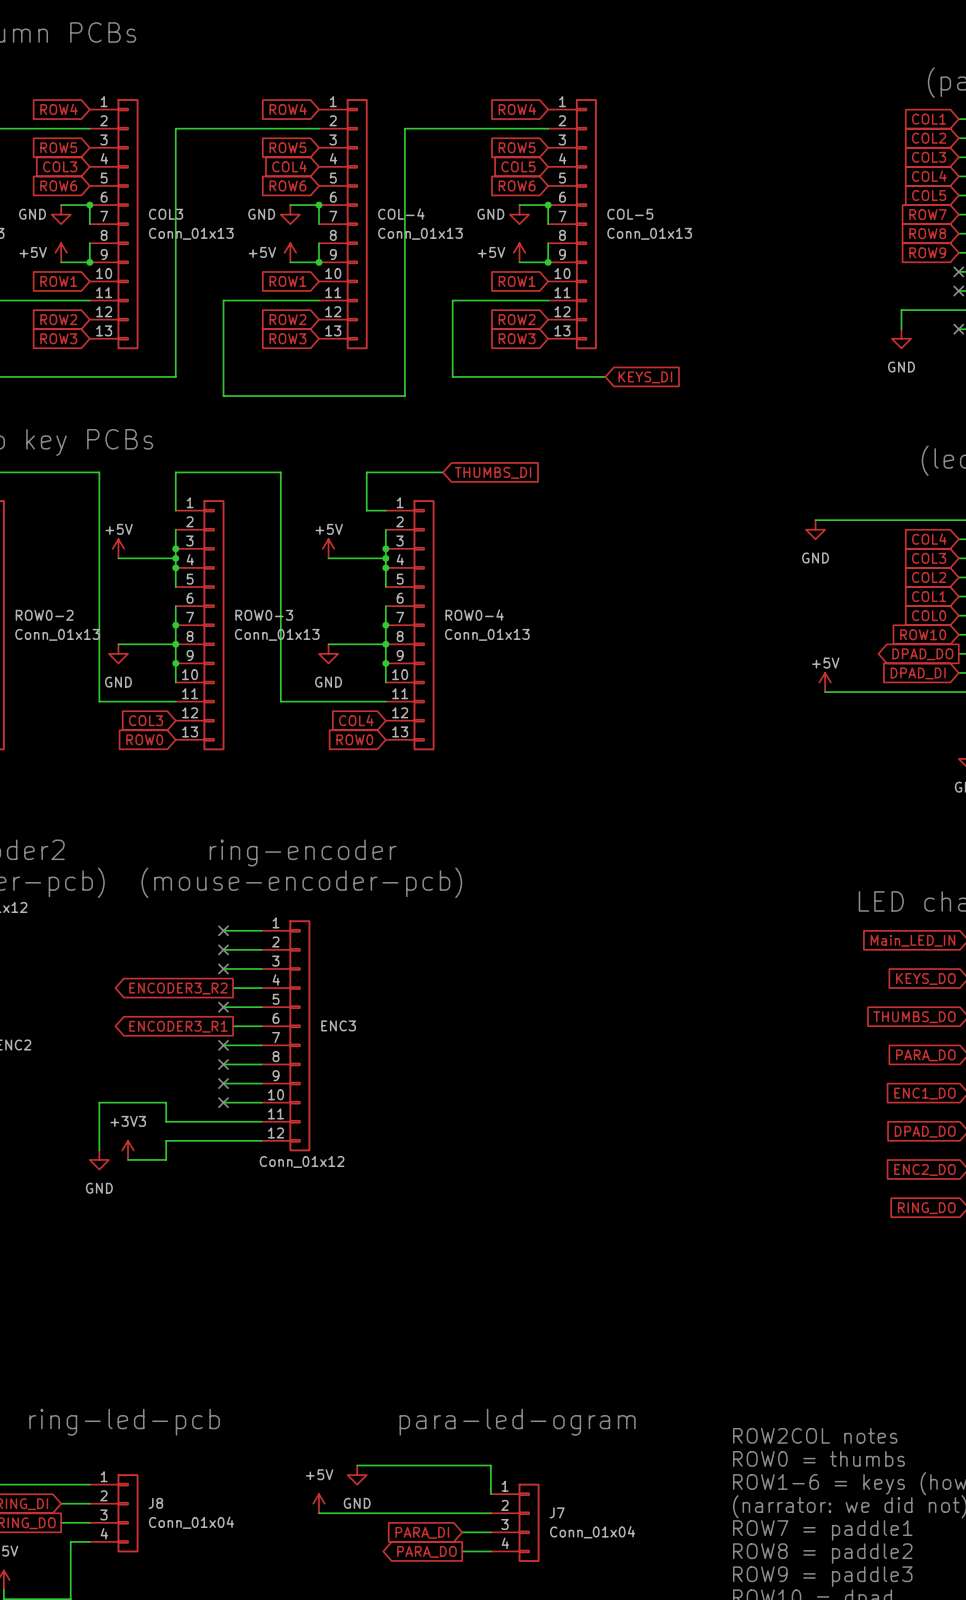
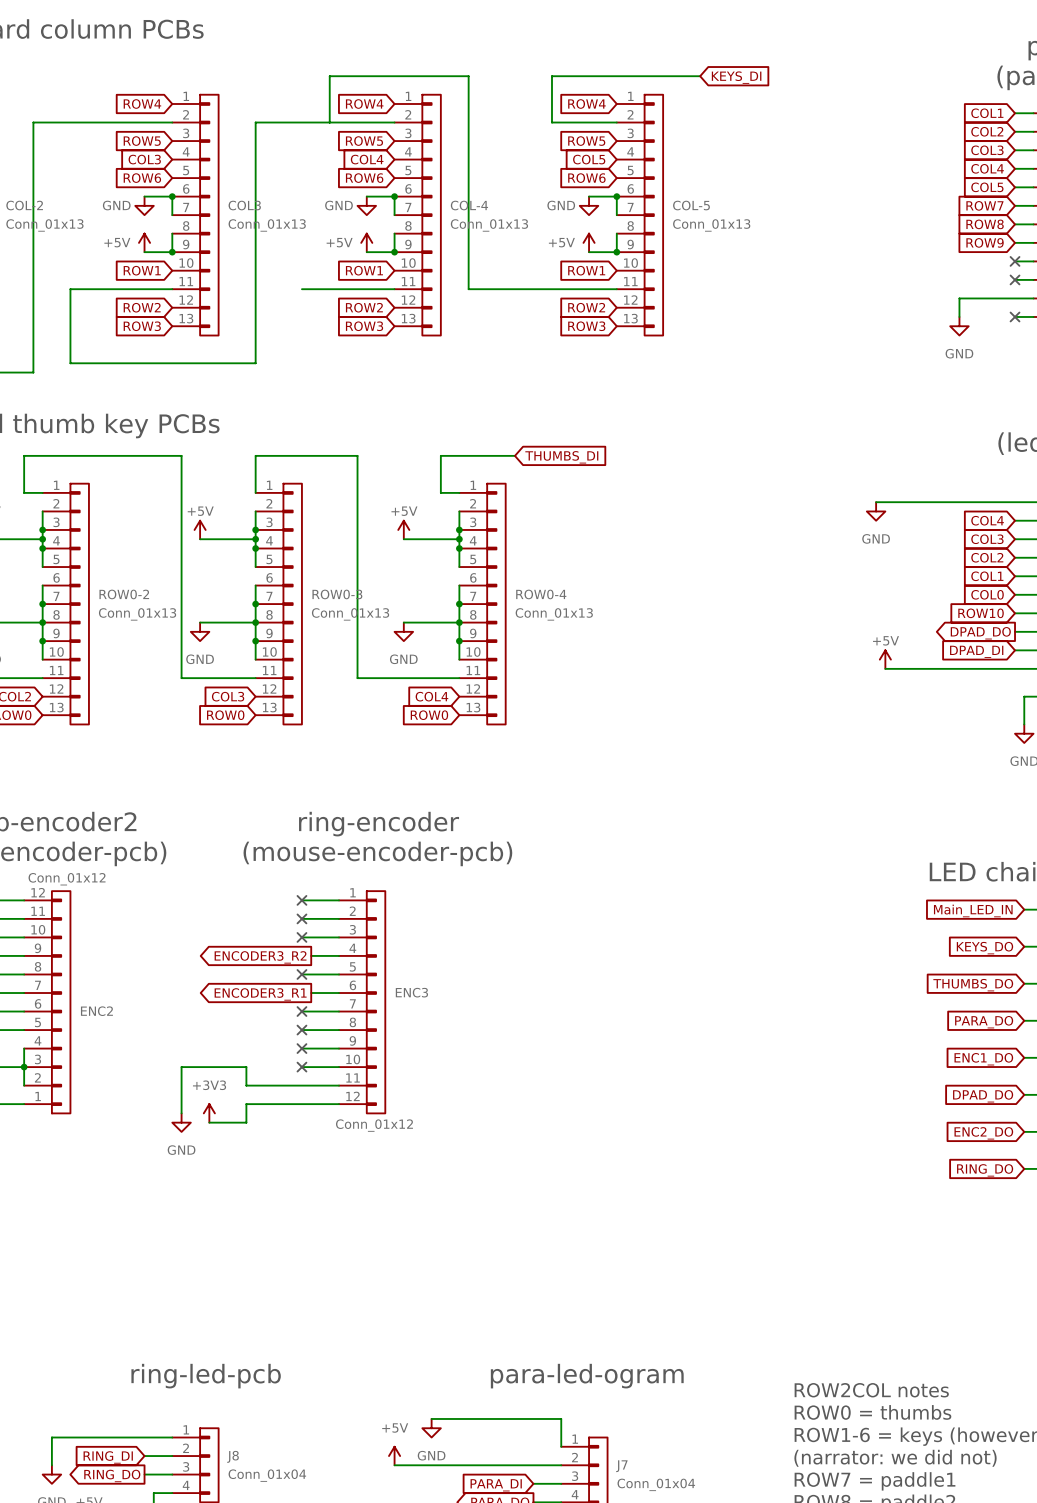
global label: none -> KEYS_DI (736, 77)
wire: (481, 128) (404, 128) (404, 396) (223, 396) (223, 300) -> (551, 122) (551, 76) (700, 76)
wire: (452, 300) (452, 376) (605, 376) -> (524, 289) (468, 289) (468, 76) (329, 76) (329, 122)
global label: KEYS_DI (645, 377) -> none

